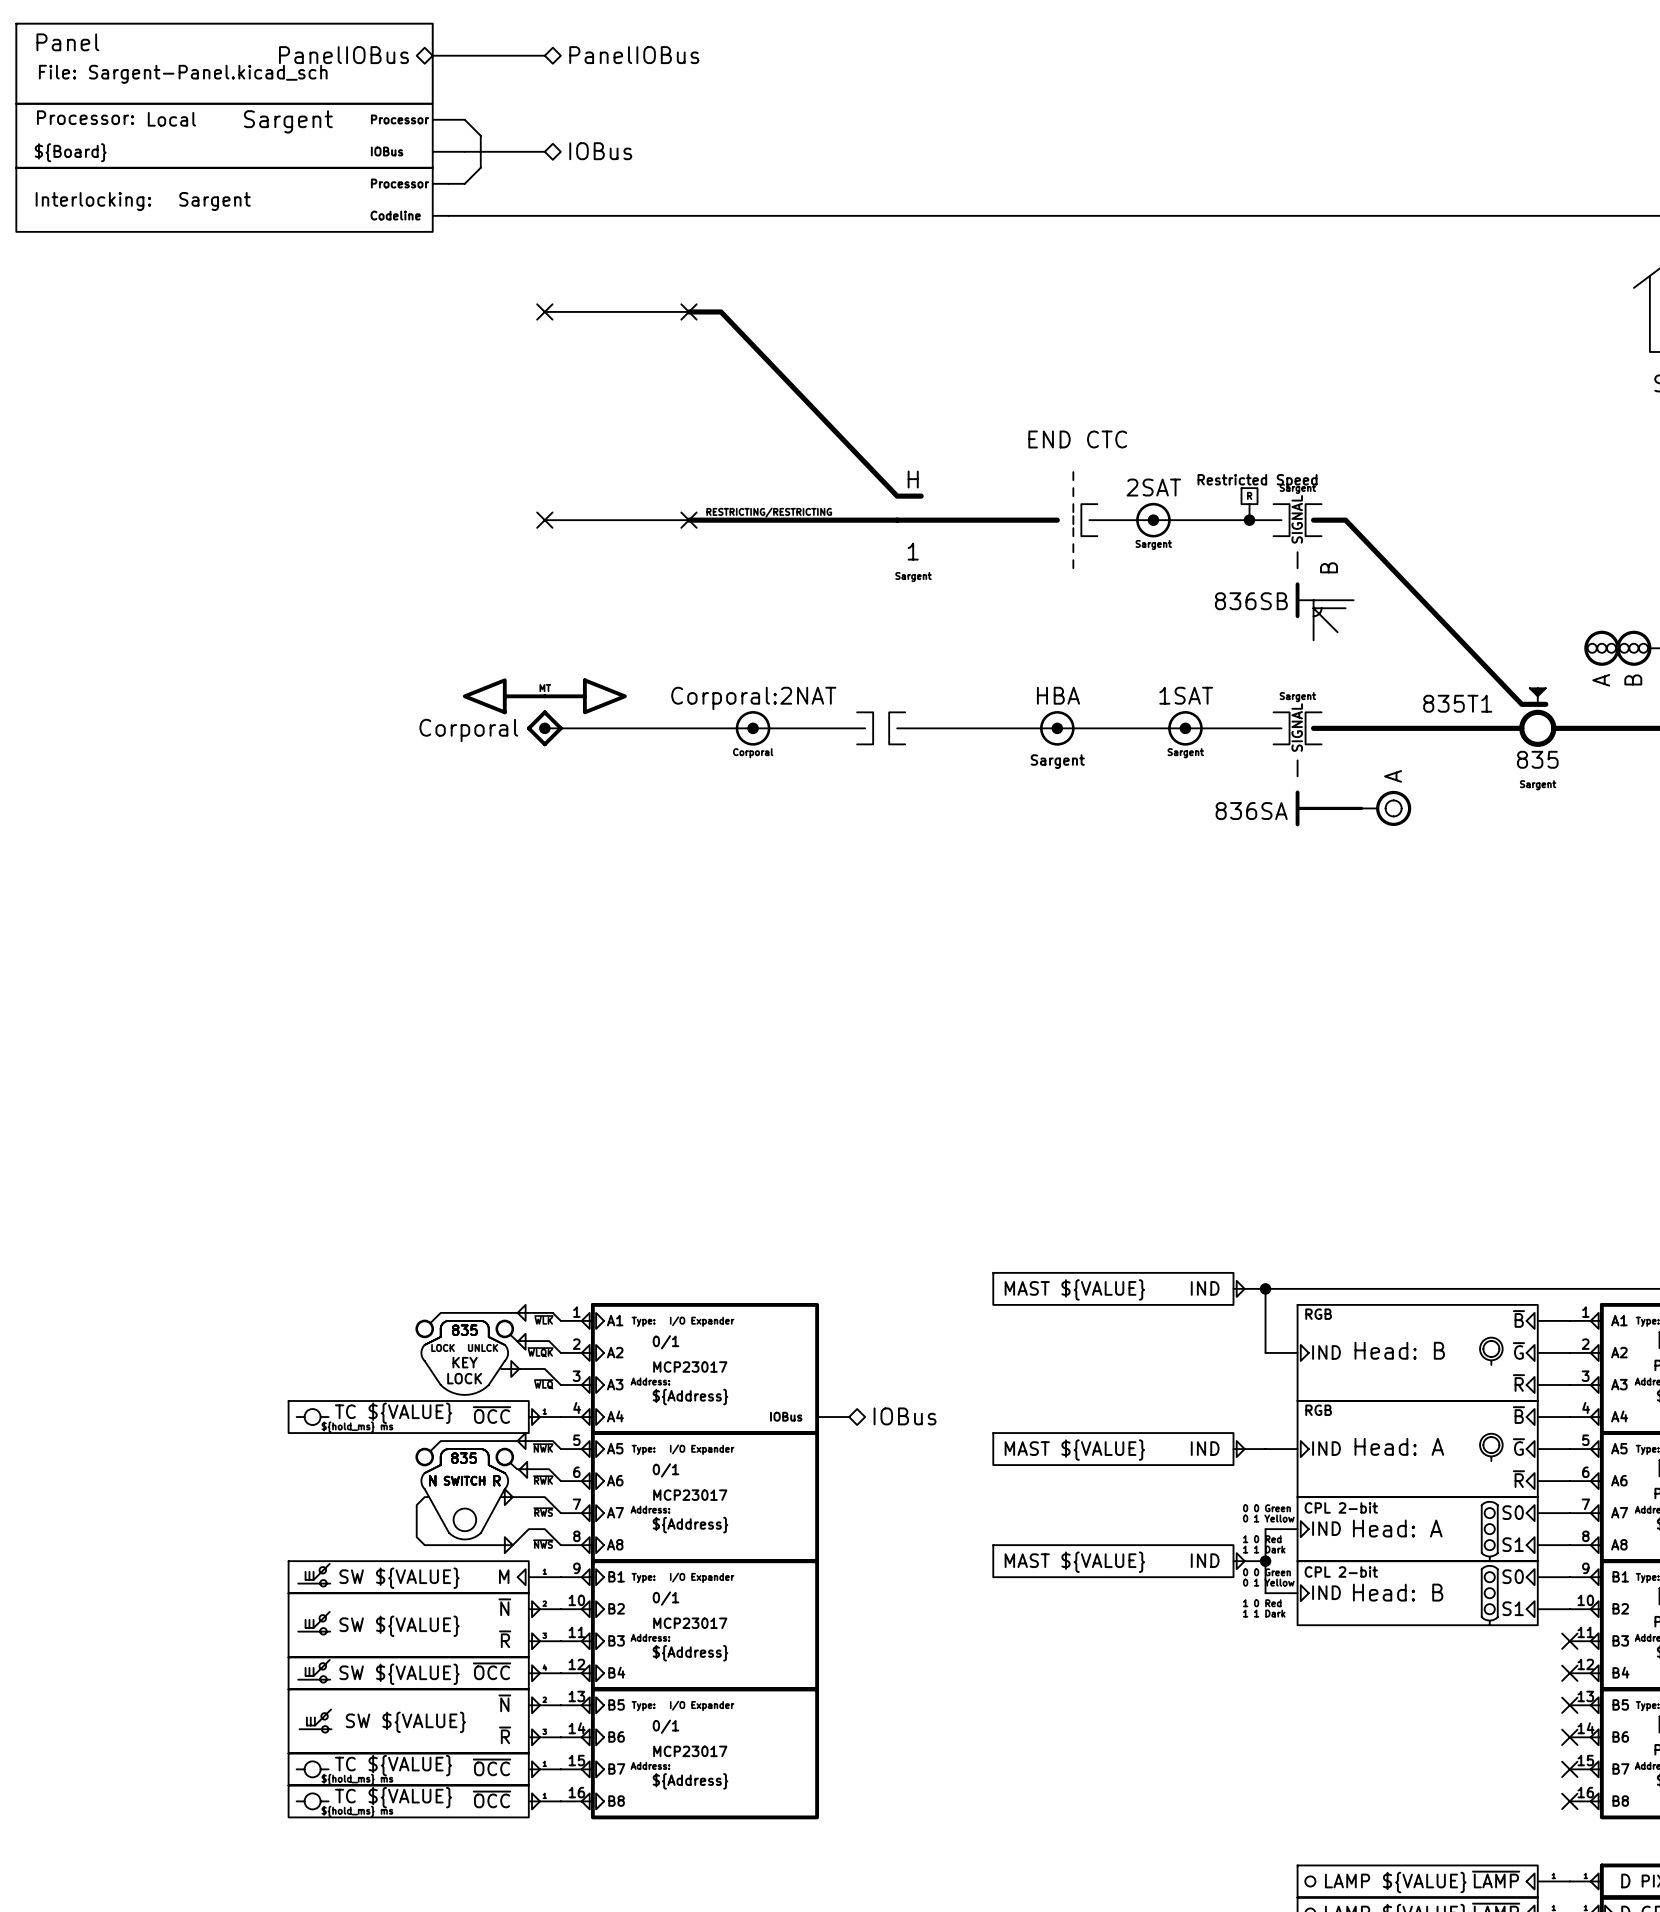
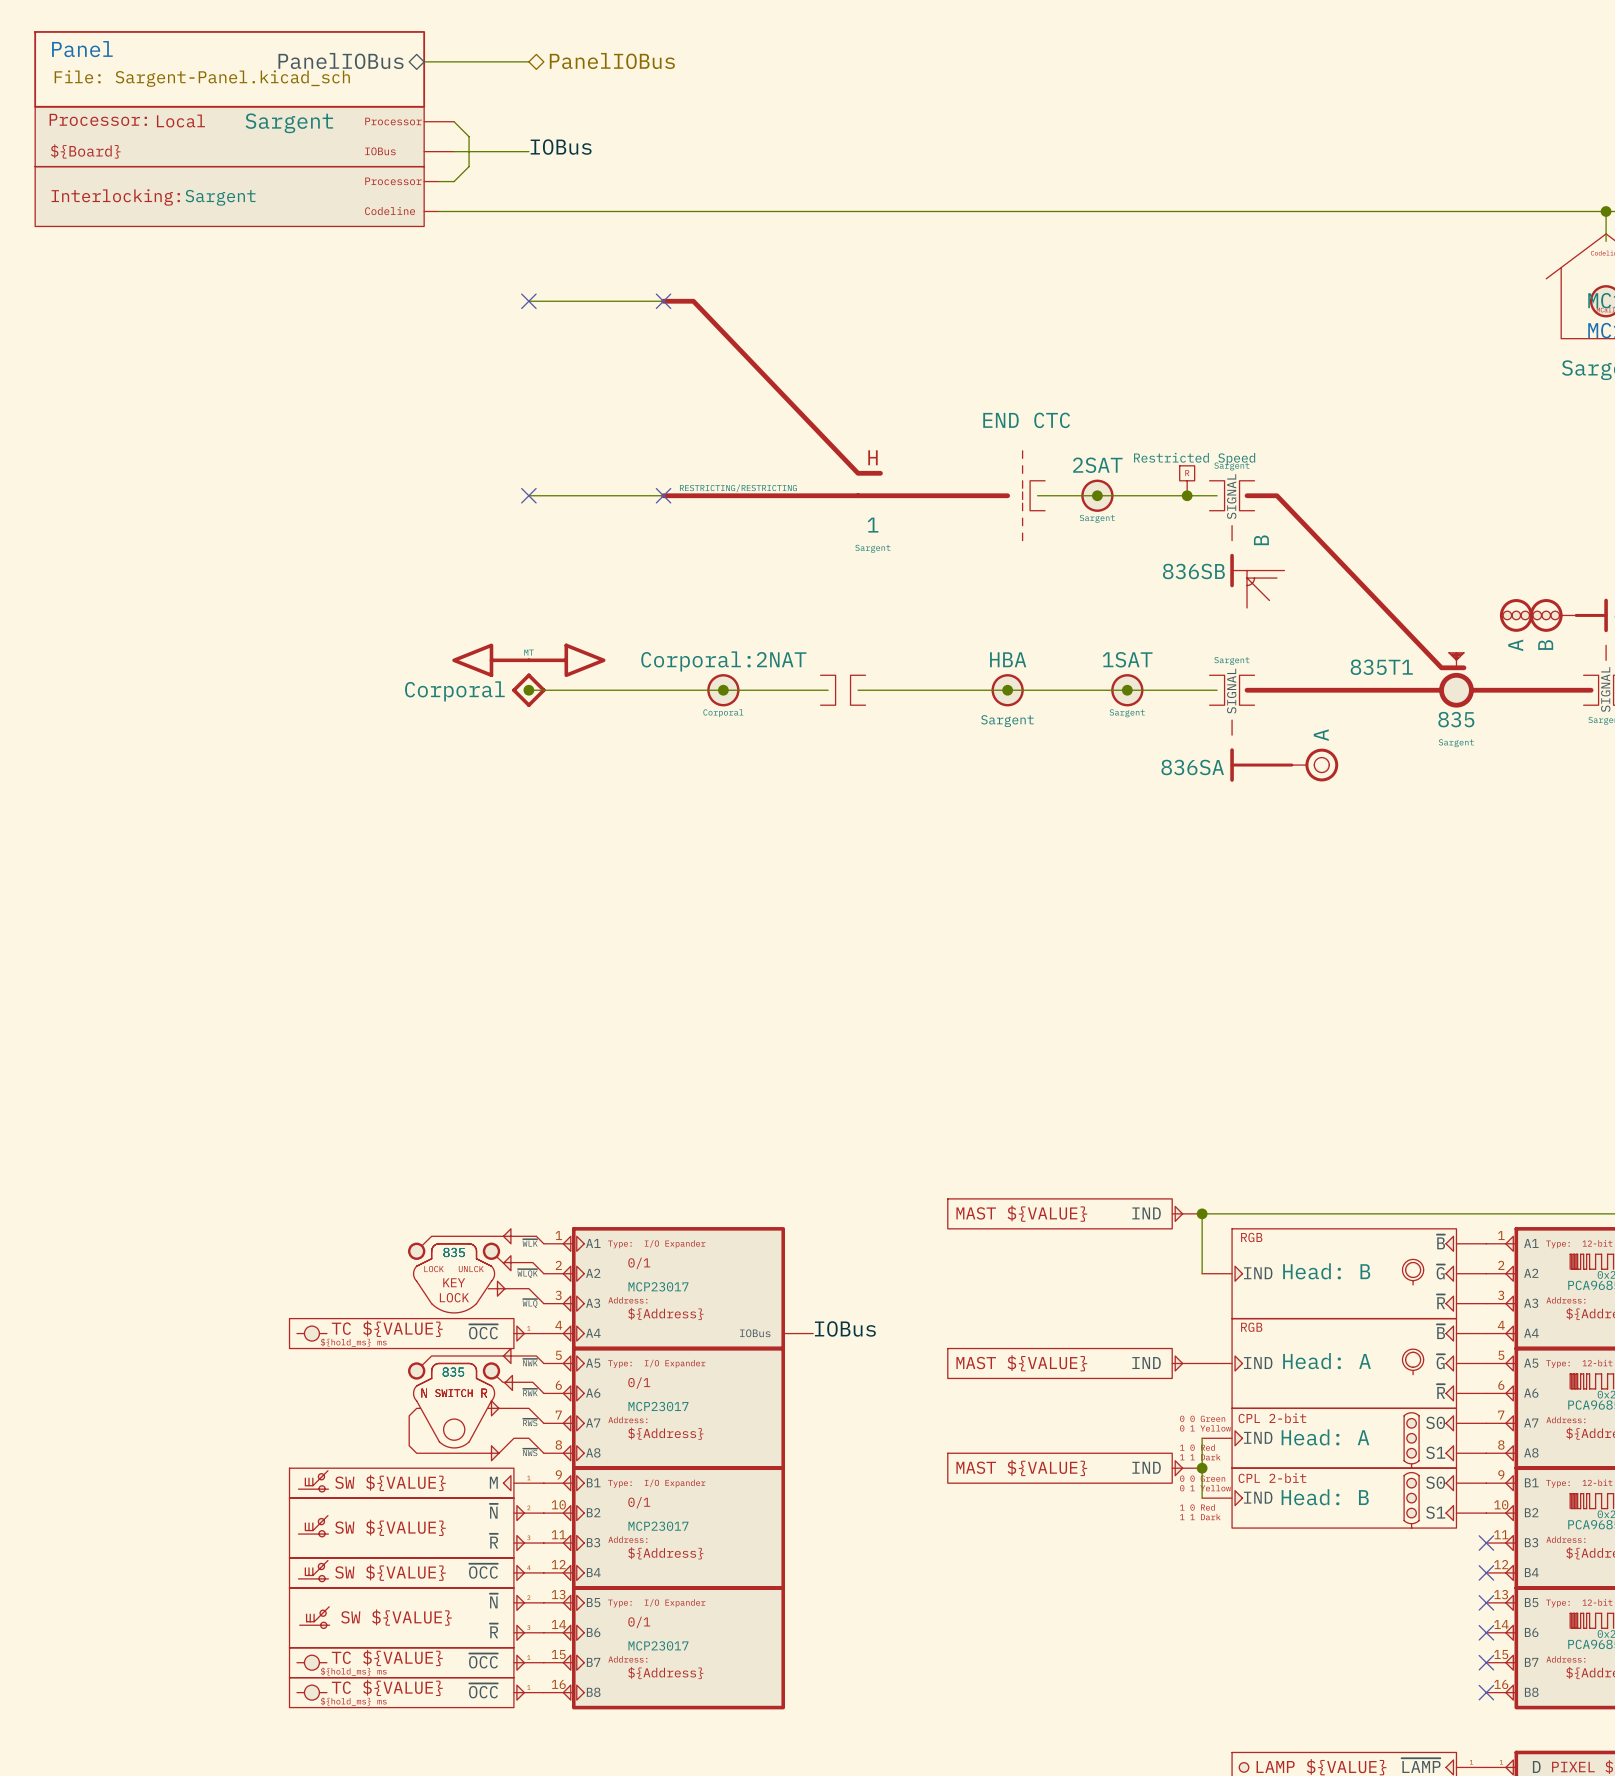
label: none -> IOBus (561, 147)
hierarchical label: IOBus (600, 151) -> none
label: none -> IOBus (845, 1328)
hierarchical label: IOBus (905, 1416) -> none

